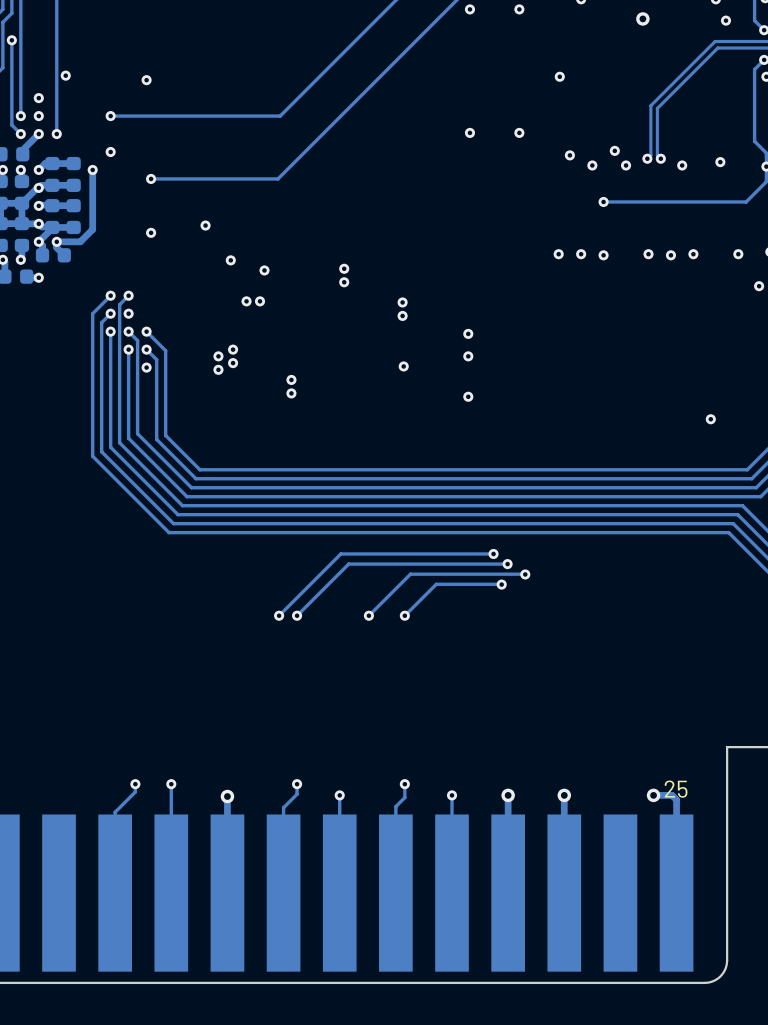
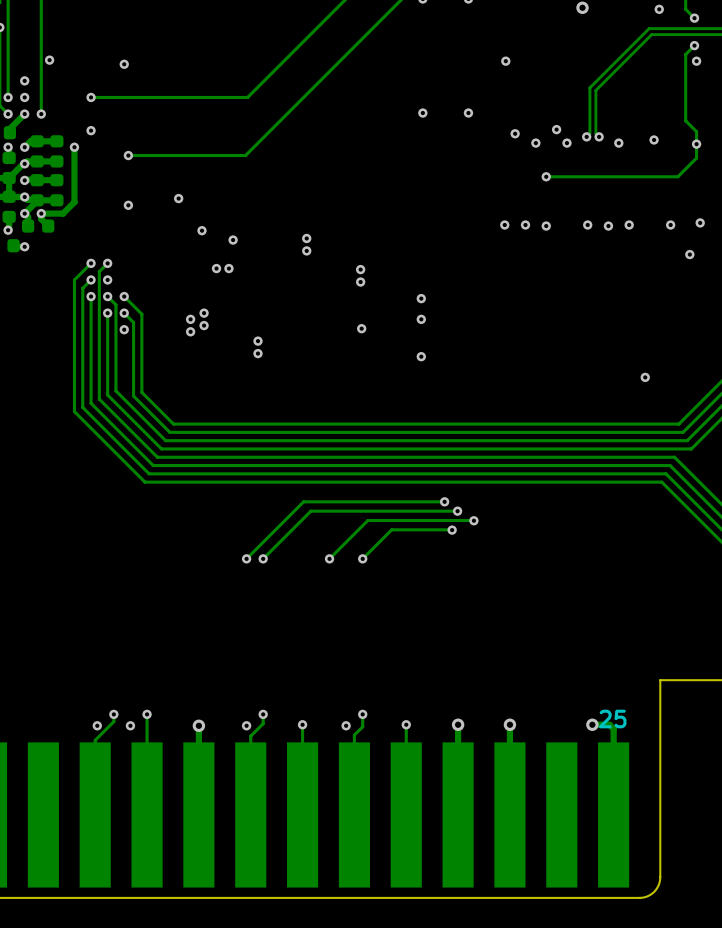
via: none -> (97, 725)
via: none -> (130, 725)
via: none -> (246, 725)
via: none -> (346, 725)

